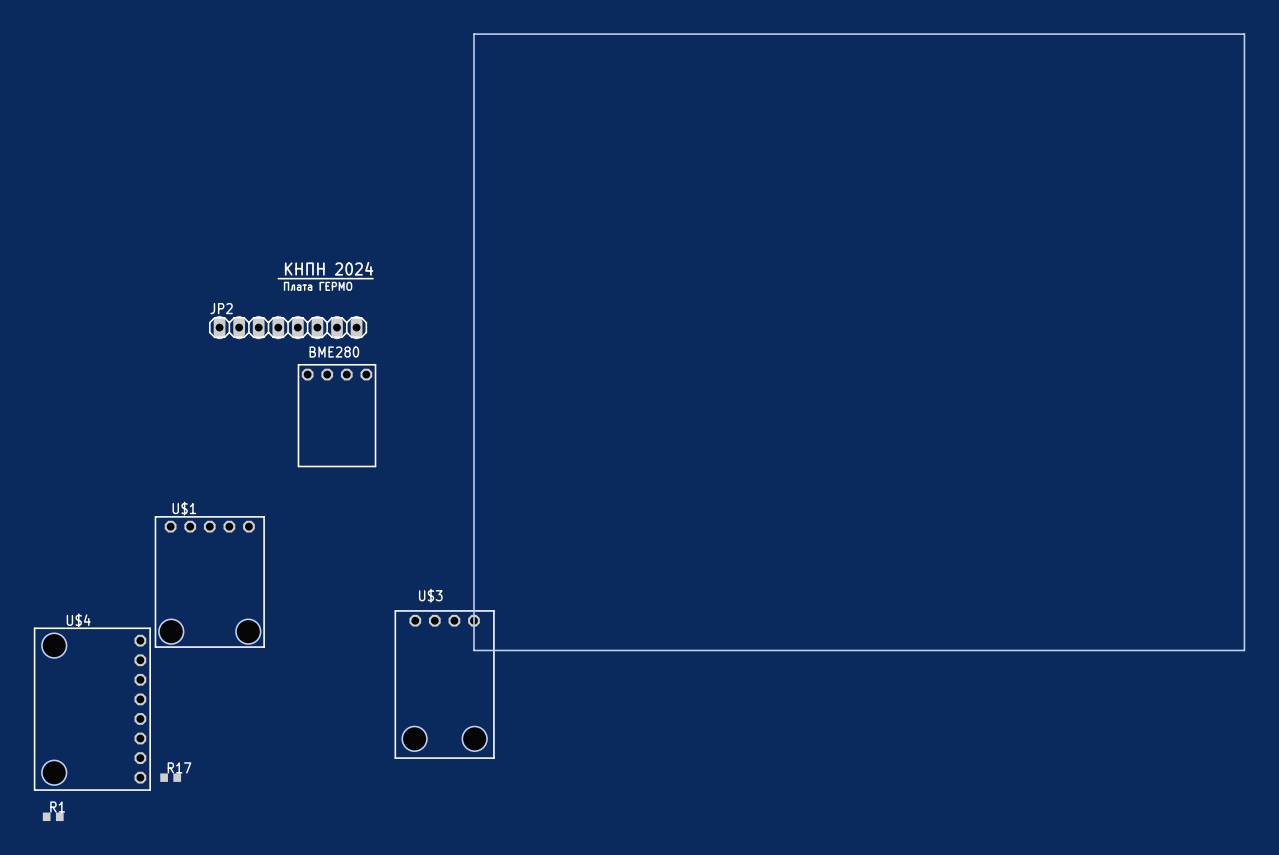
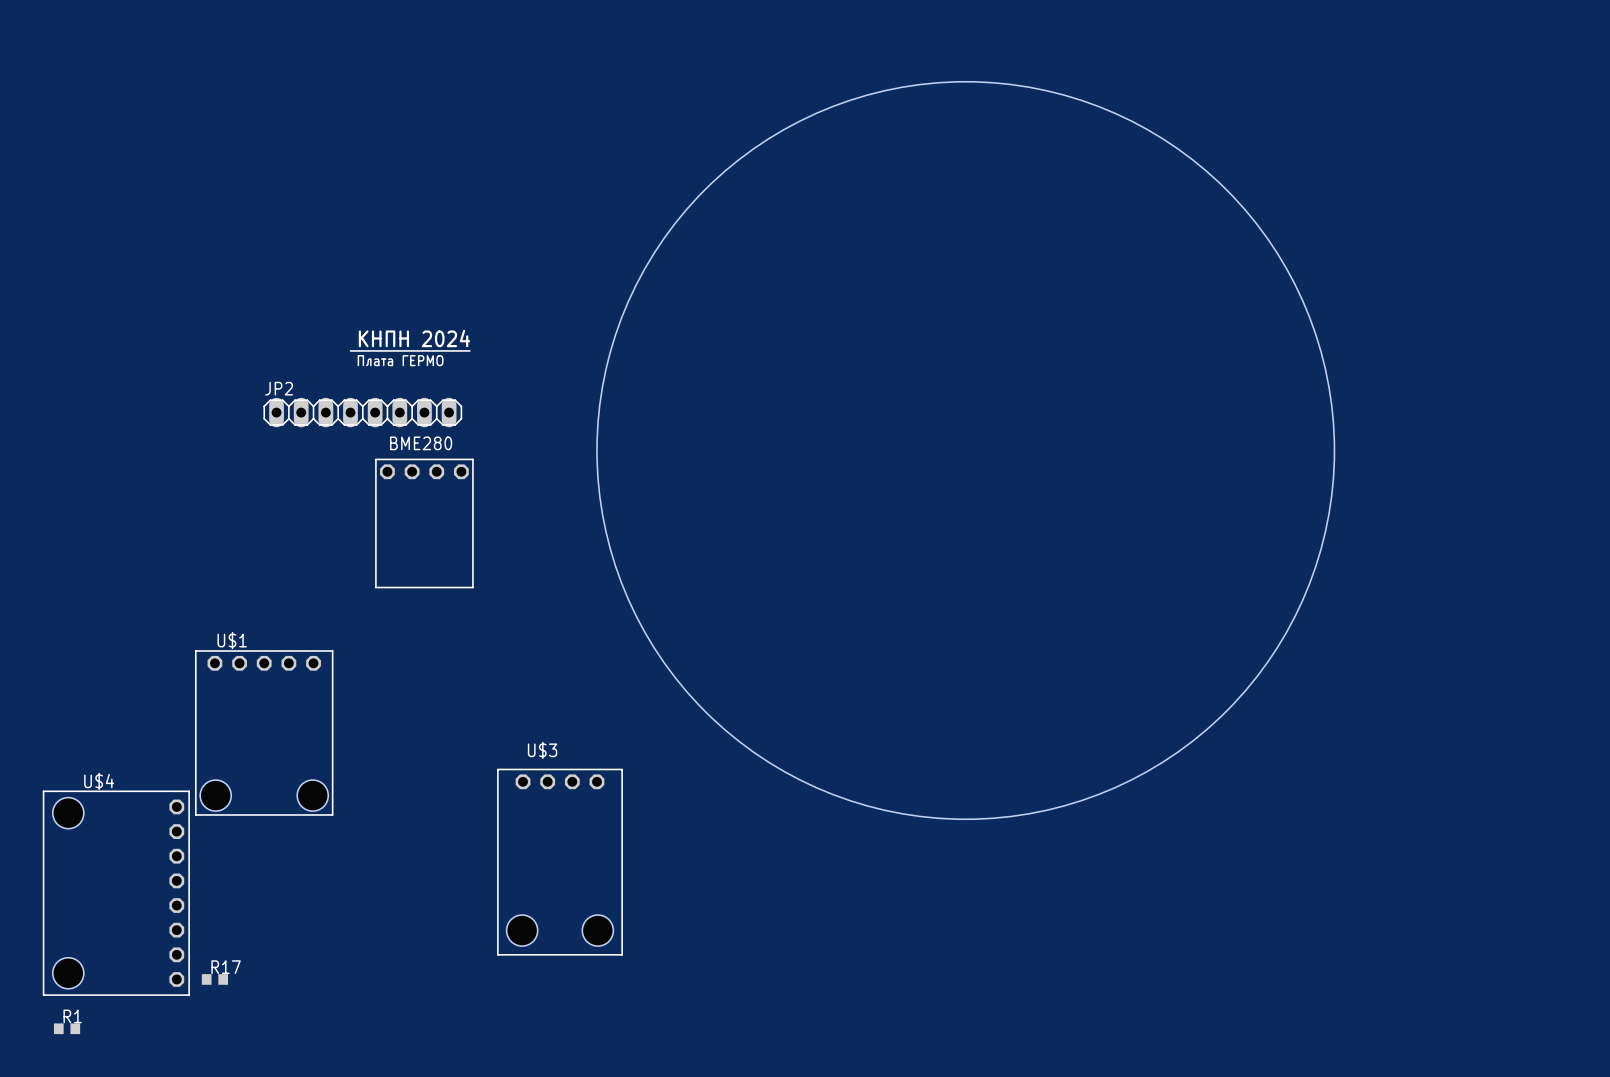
board edge: (473, 34) (1244, 34) (1244, 650) (473, 650) (473, 34) -> none
round board edge: none -> [596, 81, 1336, 820]

